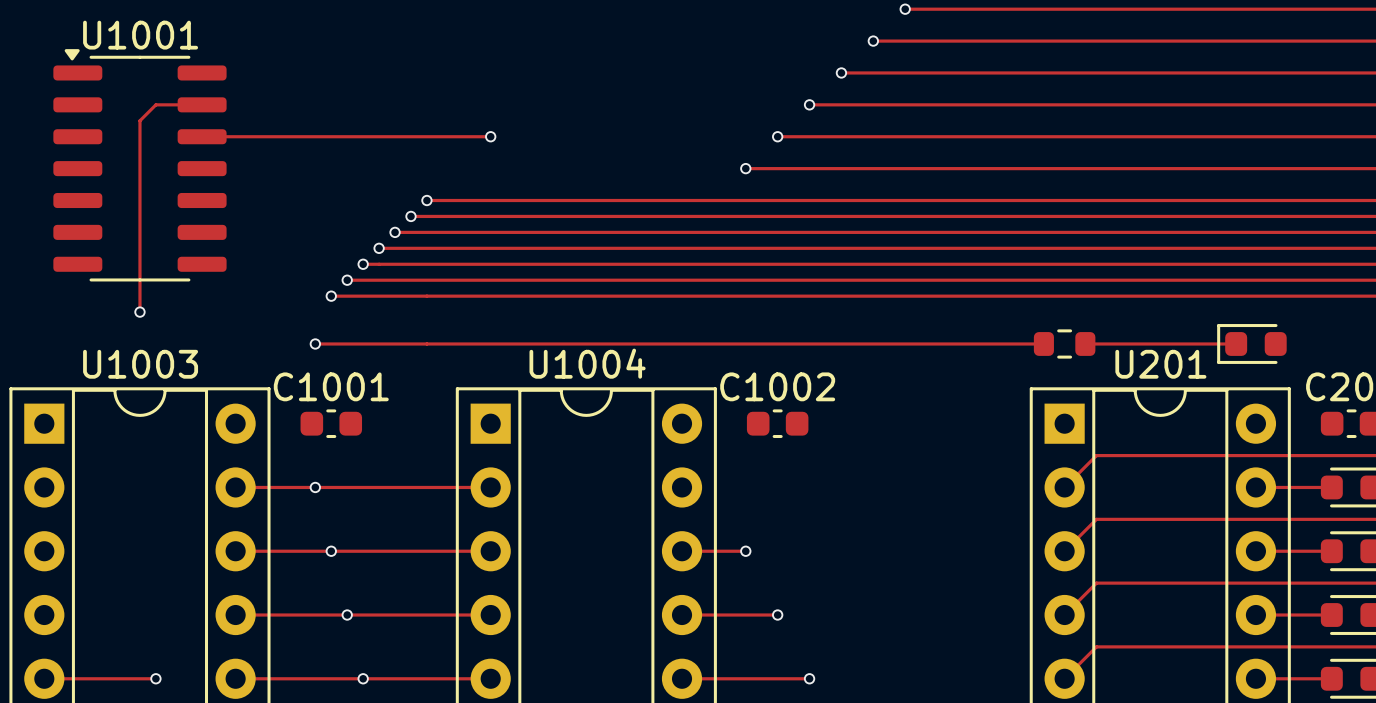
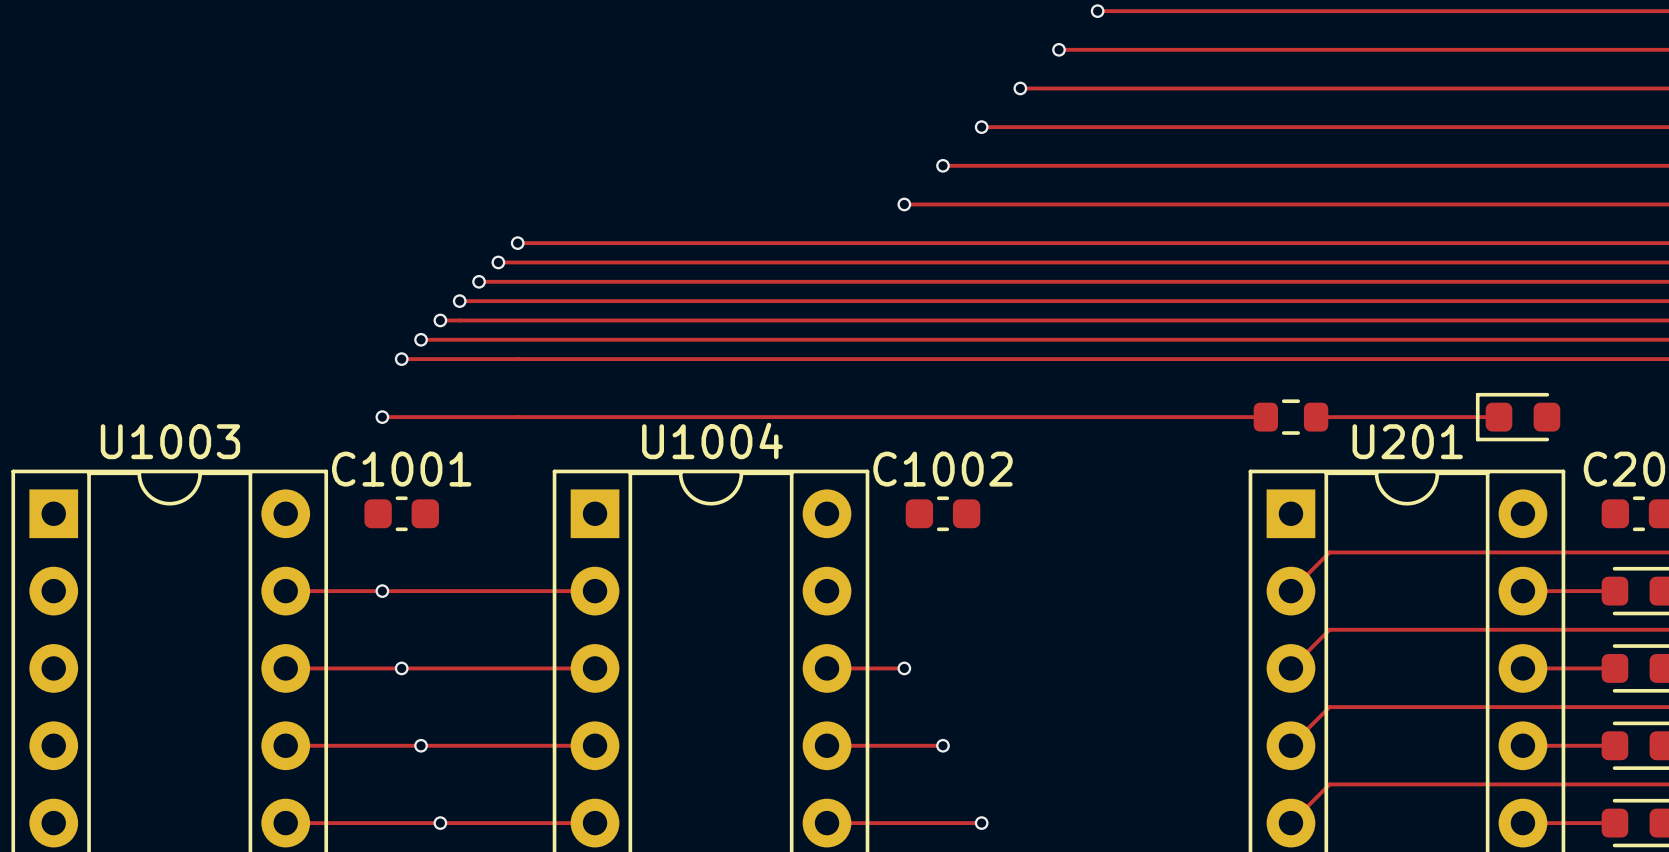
track: (202, 104) (155, 104) (139, 120) (139, 312) -> none
track: (202, 136) (490, 136) -> none
via: (490, 136) -> none
U1001: (139, 165) -> none
via: (139, 312) -> none
track: (44, 678) (155, 678) -> none
via: (155, 678) -> none

